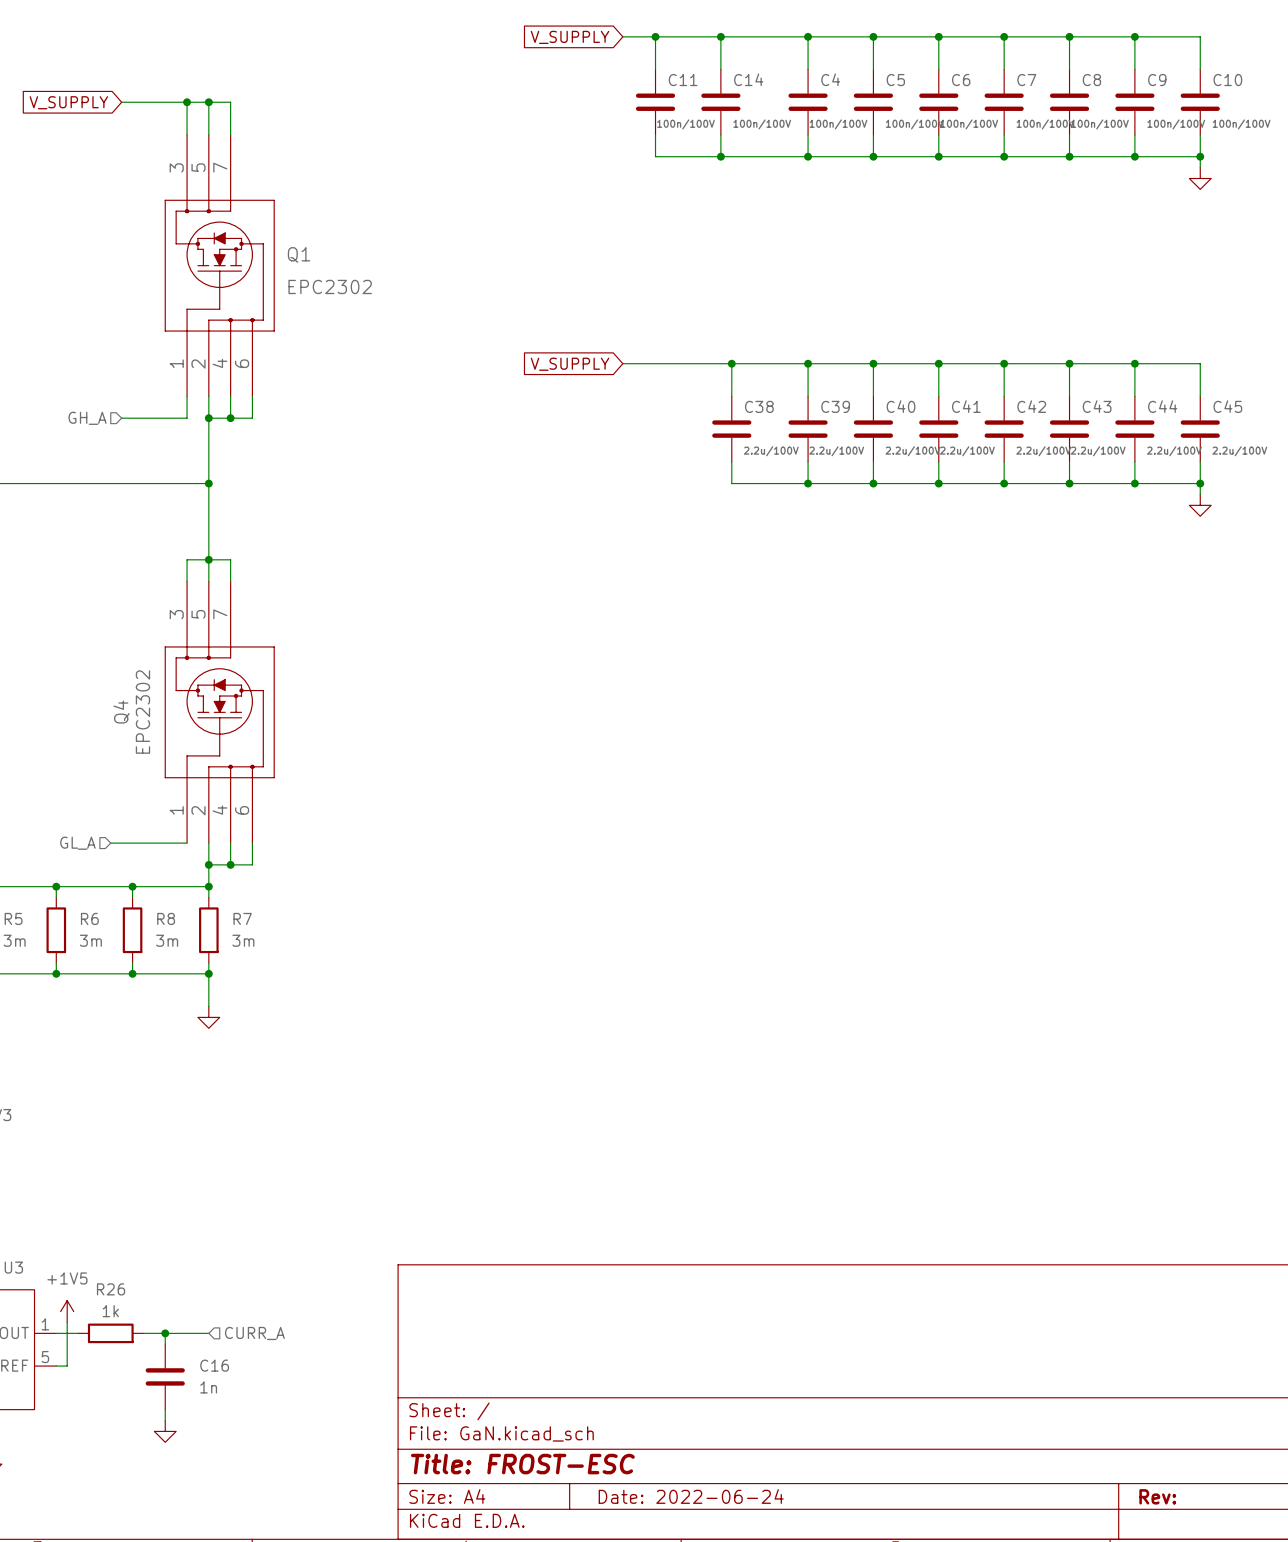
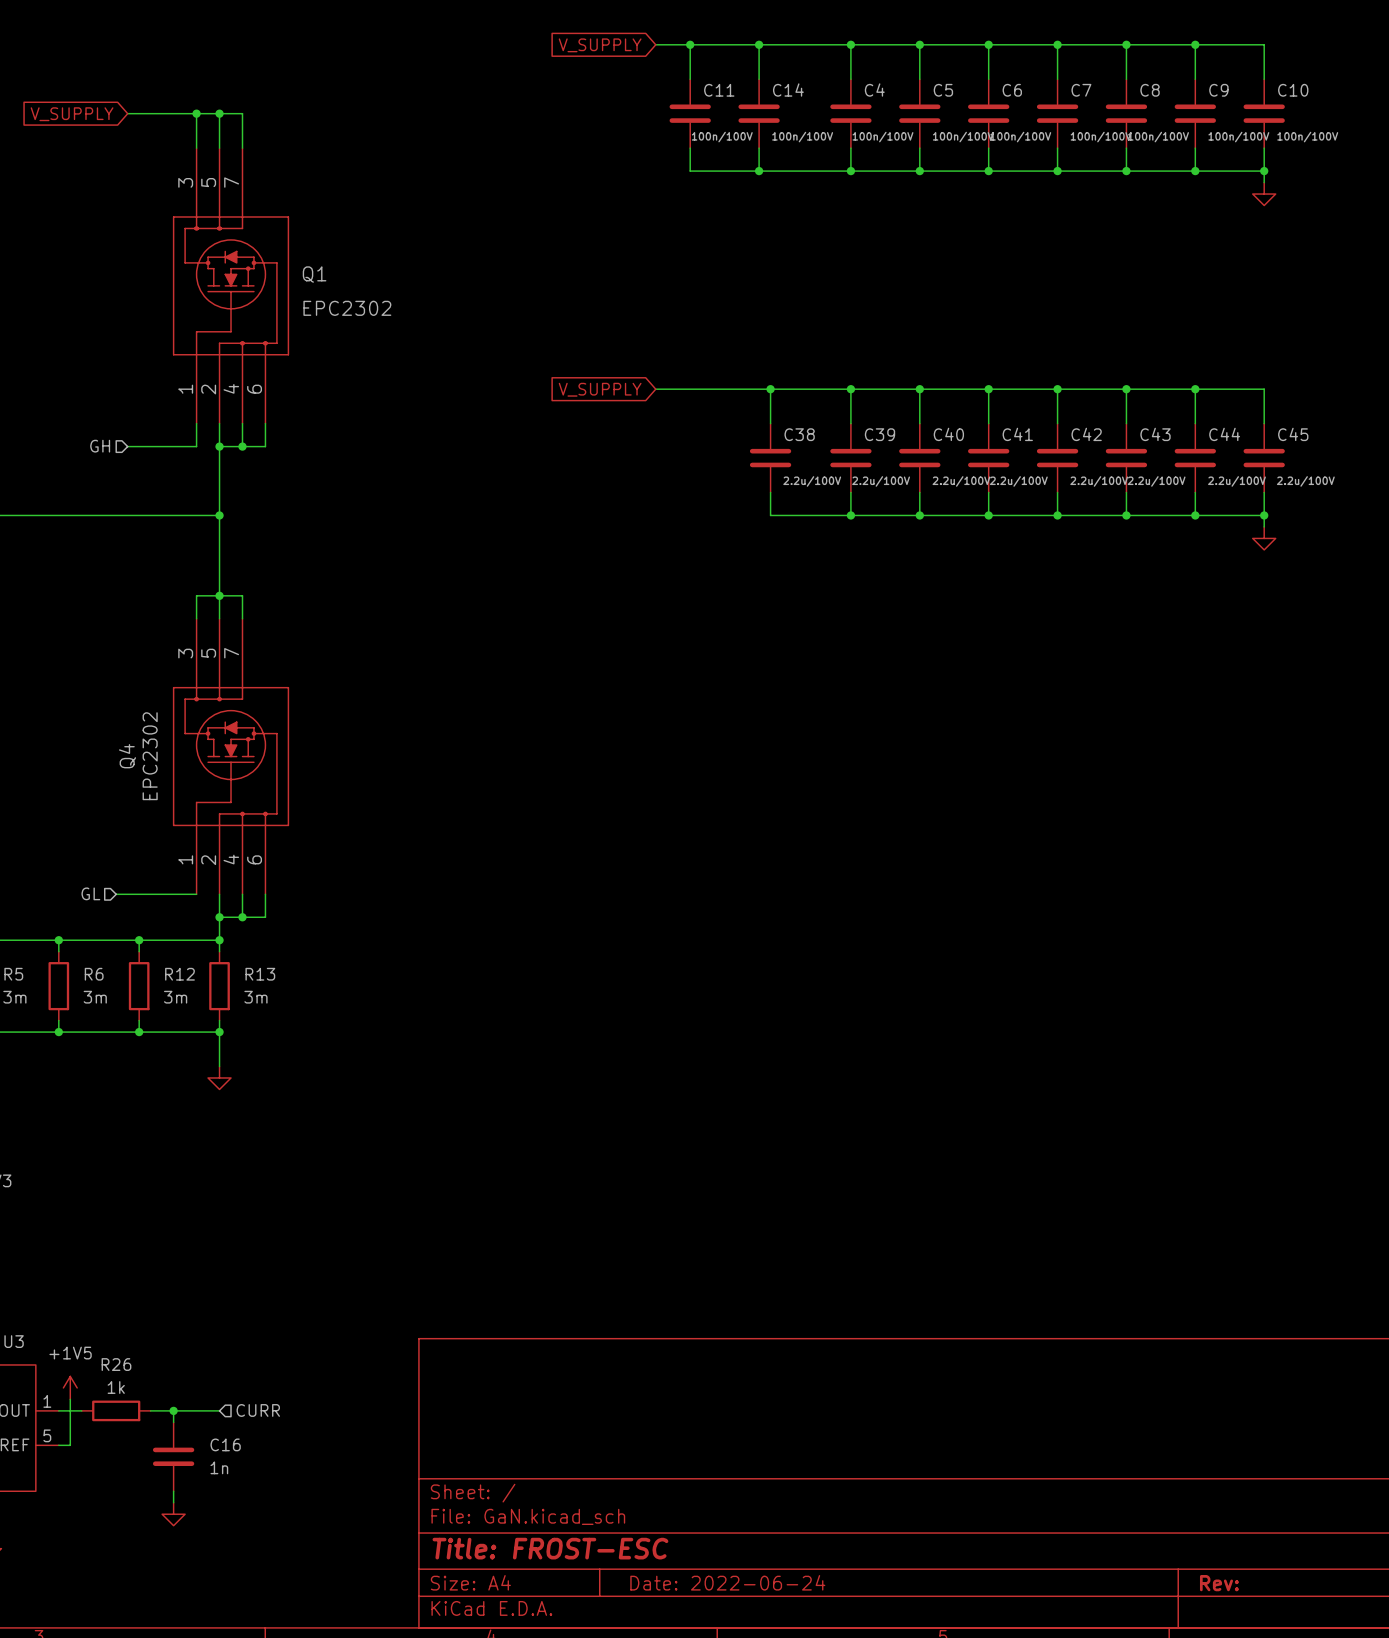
hierarchical label: GH_A (87, 418) -> GH (100, 446)
hierarchical label: GL_A (77, 843) -> GL (90, 893)
R8 name: R8 (166, 918) -> R12 (179, 974)
R7 name: R7 (242, 918) -> R13 (260, 974)
hierarchical label: CURR_A (254, 1333) -> CURR (258, 1410)

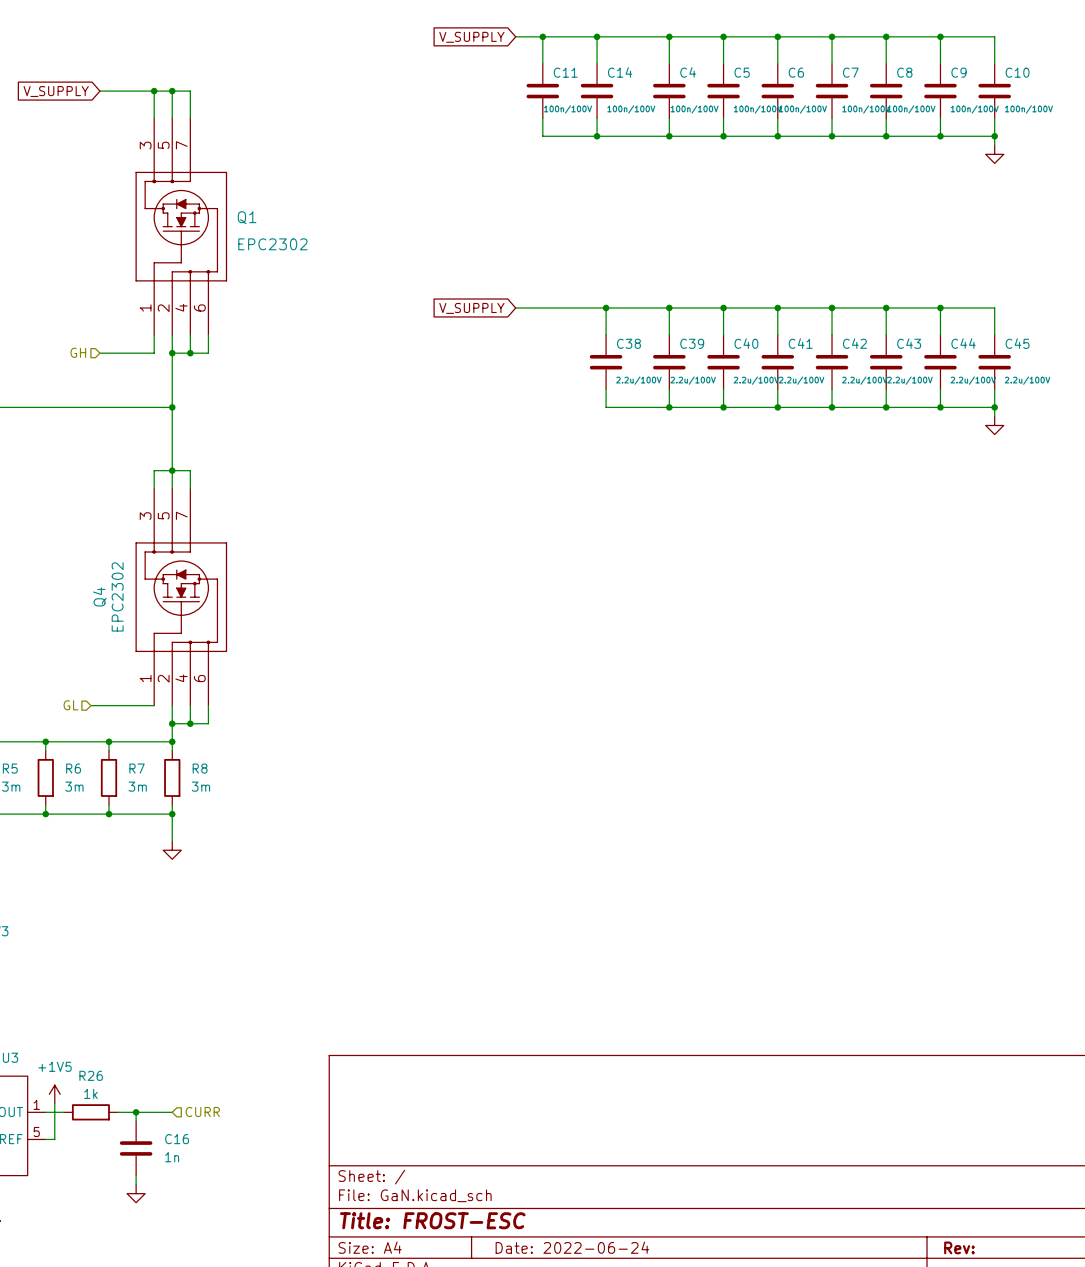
R12 name: R12 (179, 974) -> R7 (137, 768)
R13 name: R13 (260, 974) -> R8 (200, 768)

